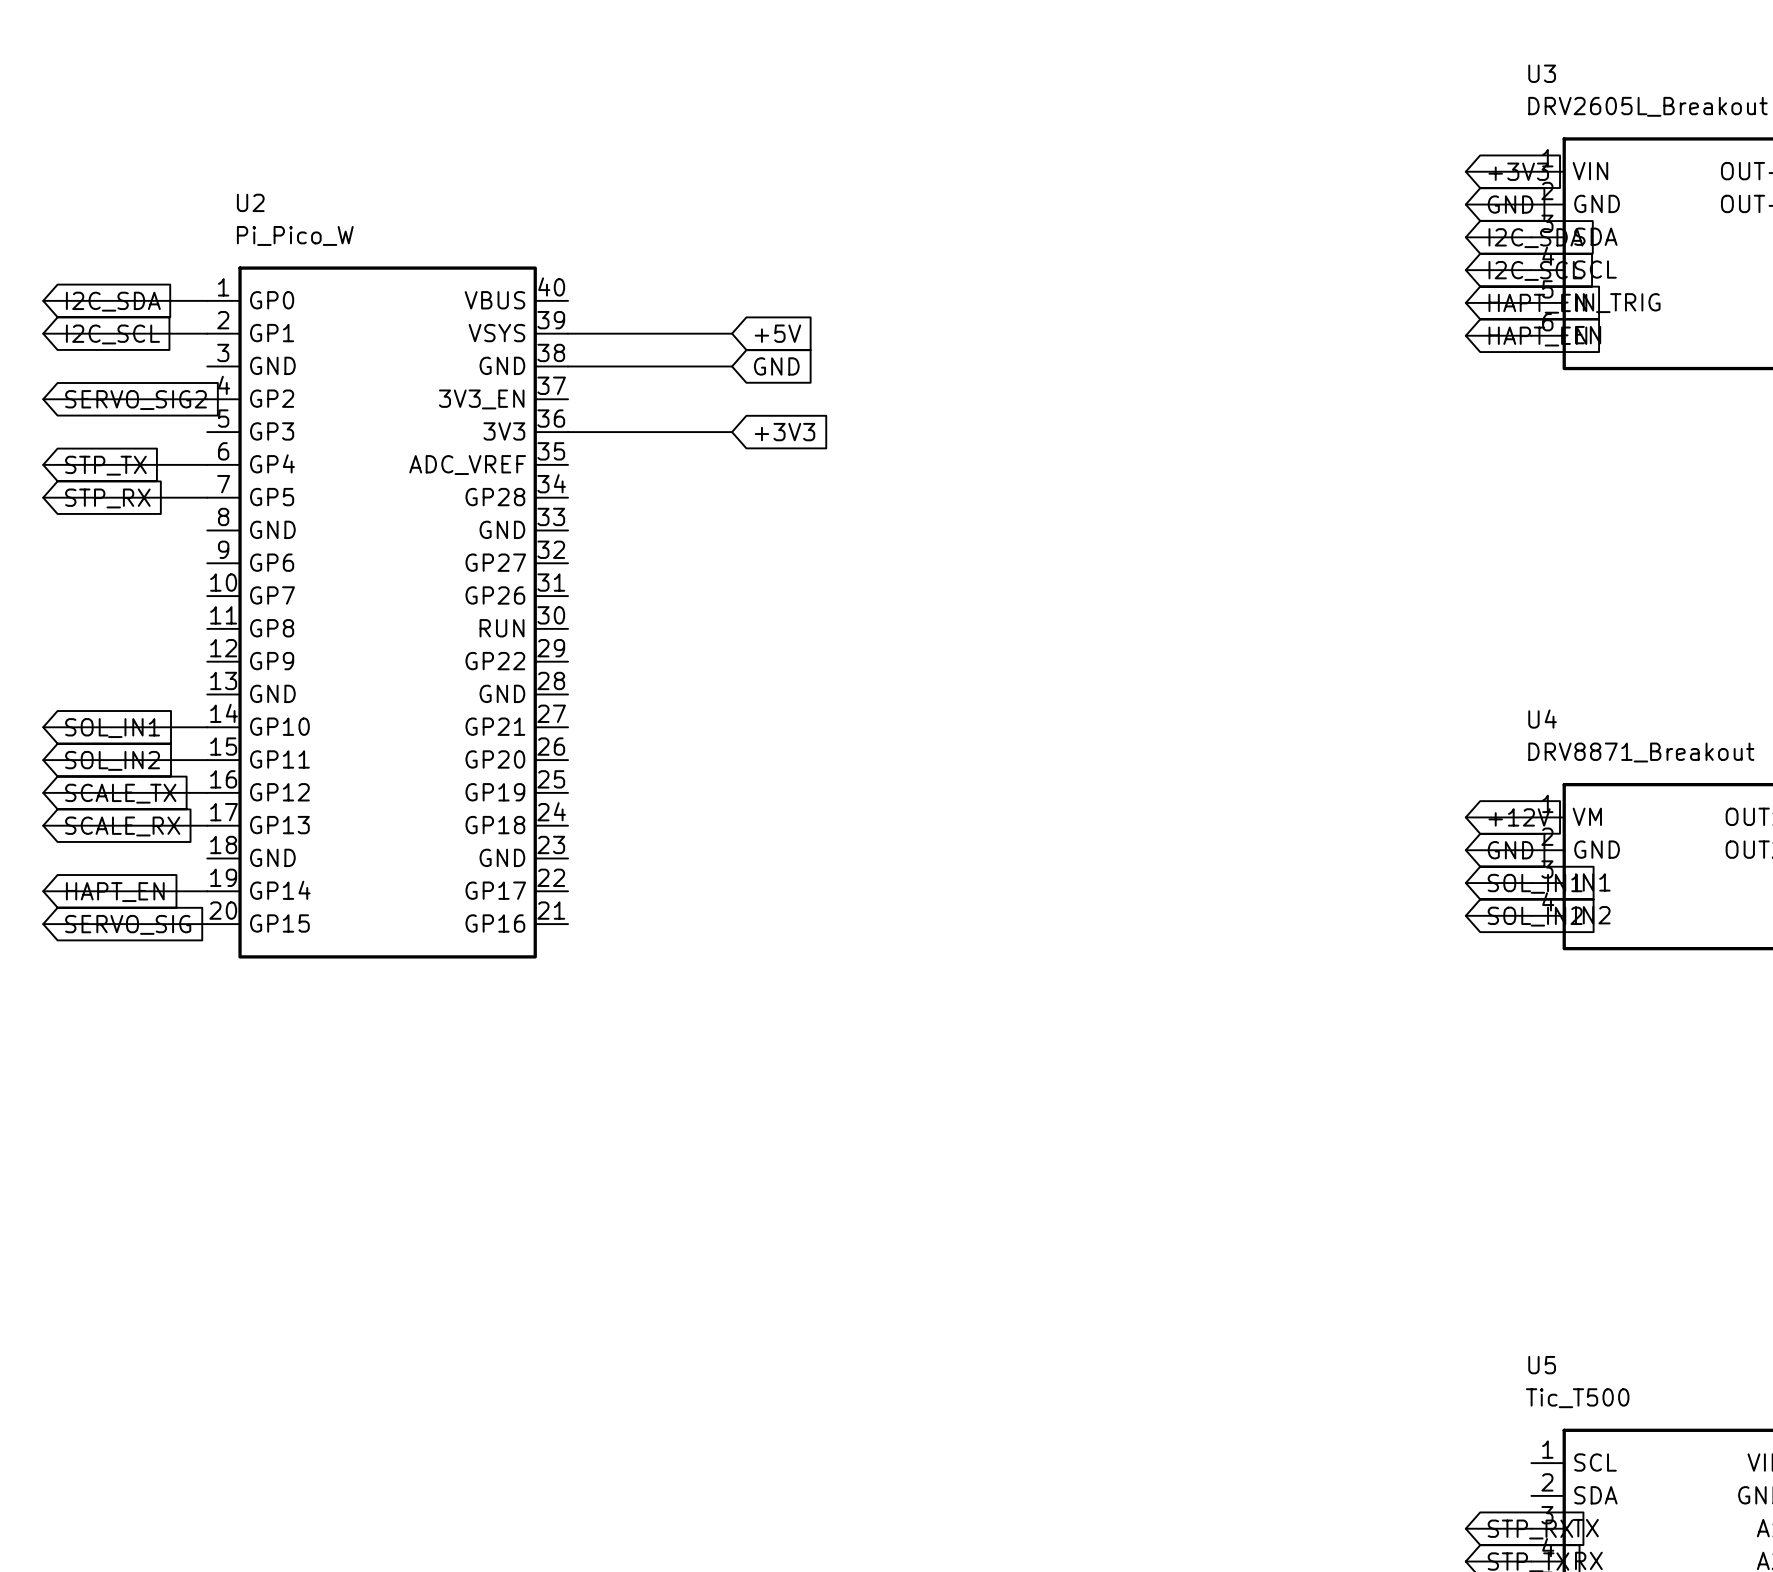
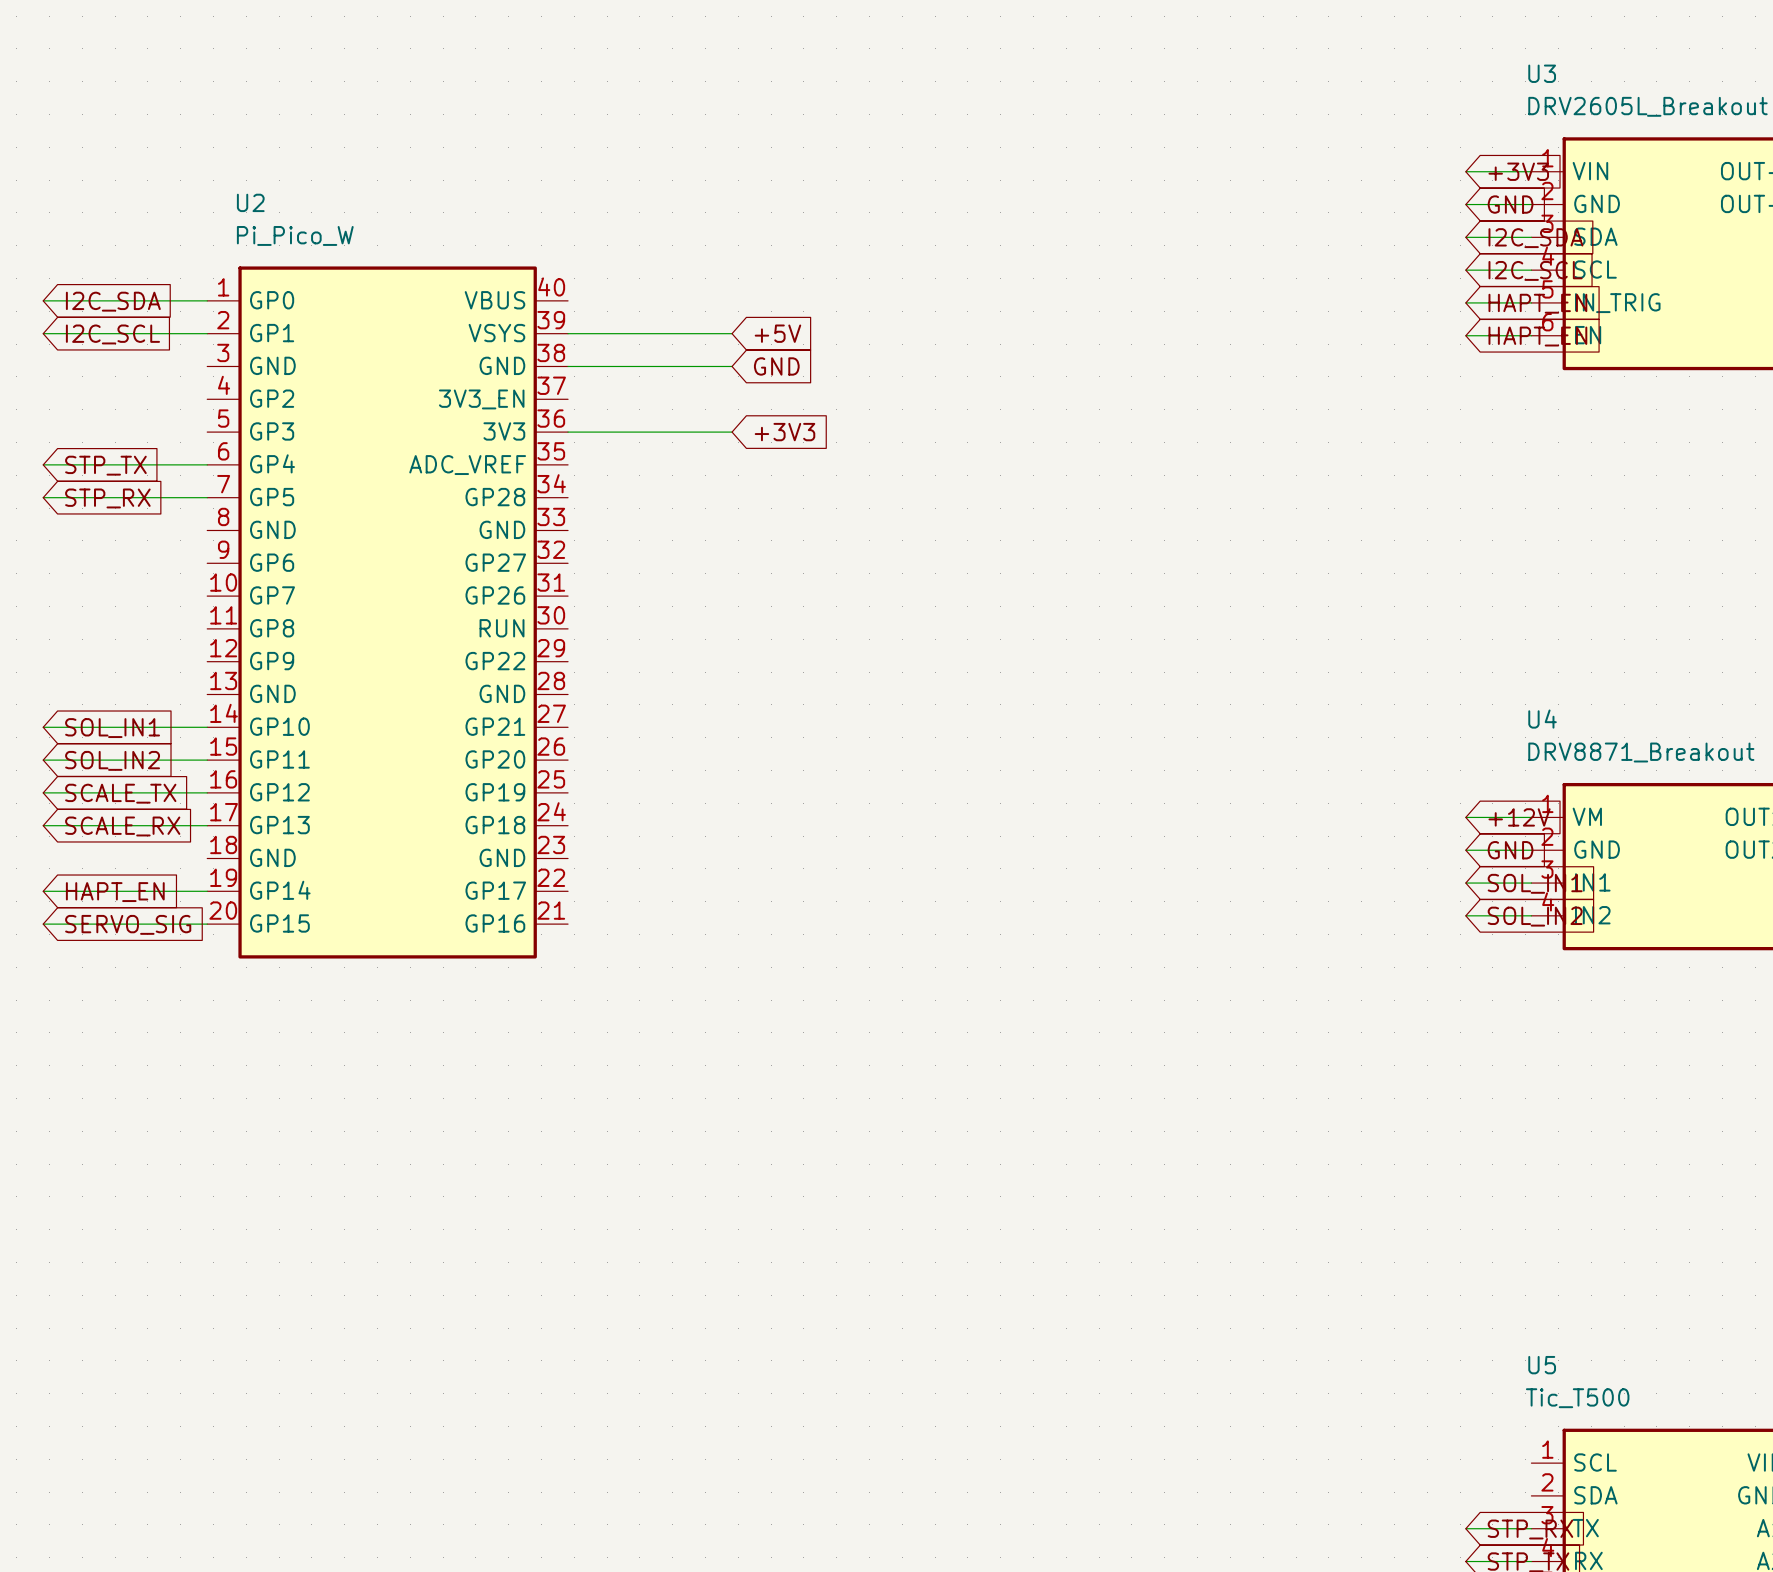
wire: (43, 399) (207, 399) -> none
global label: SERVO_SIG2 (136, 400) -> none

